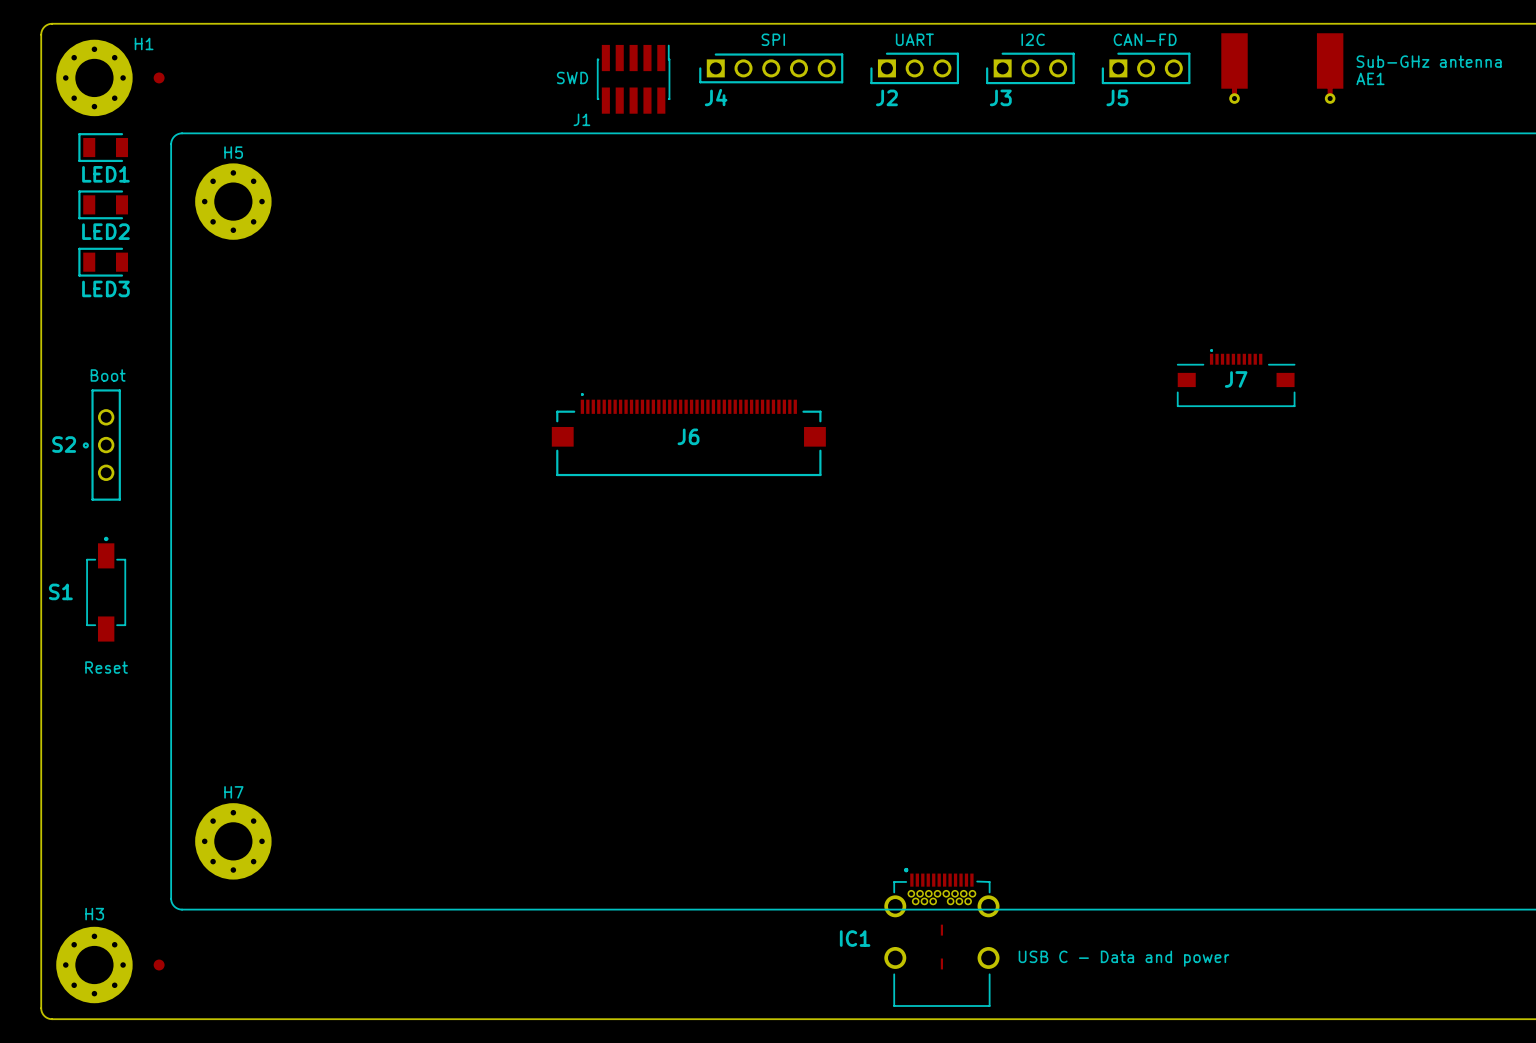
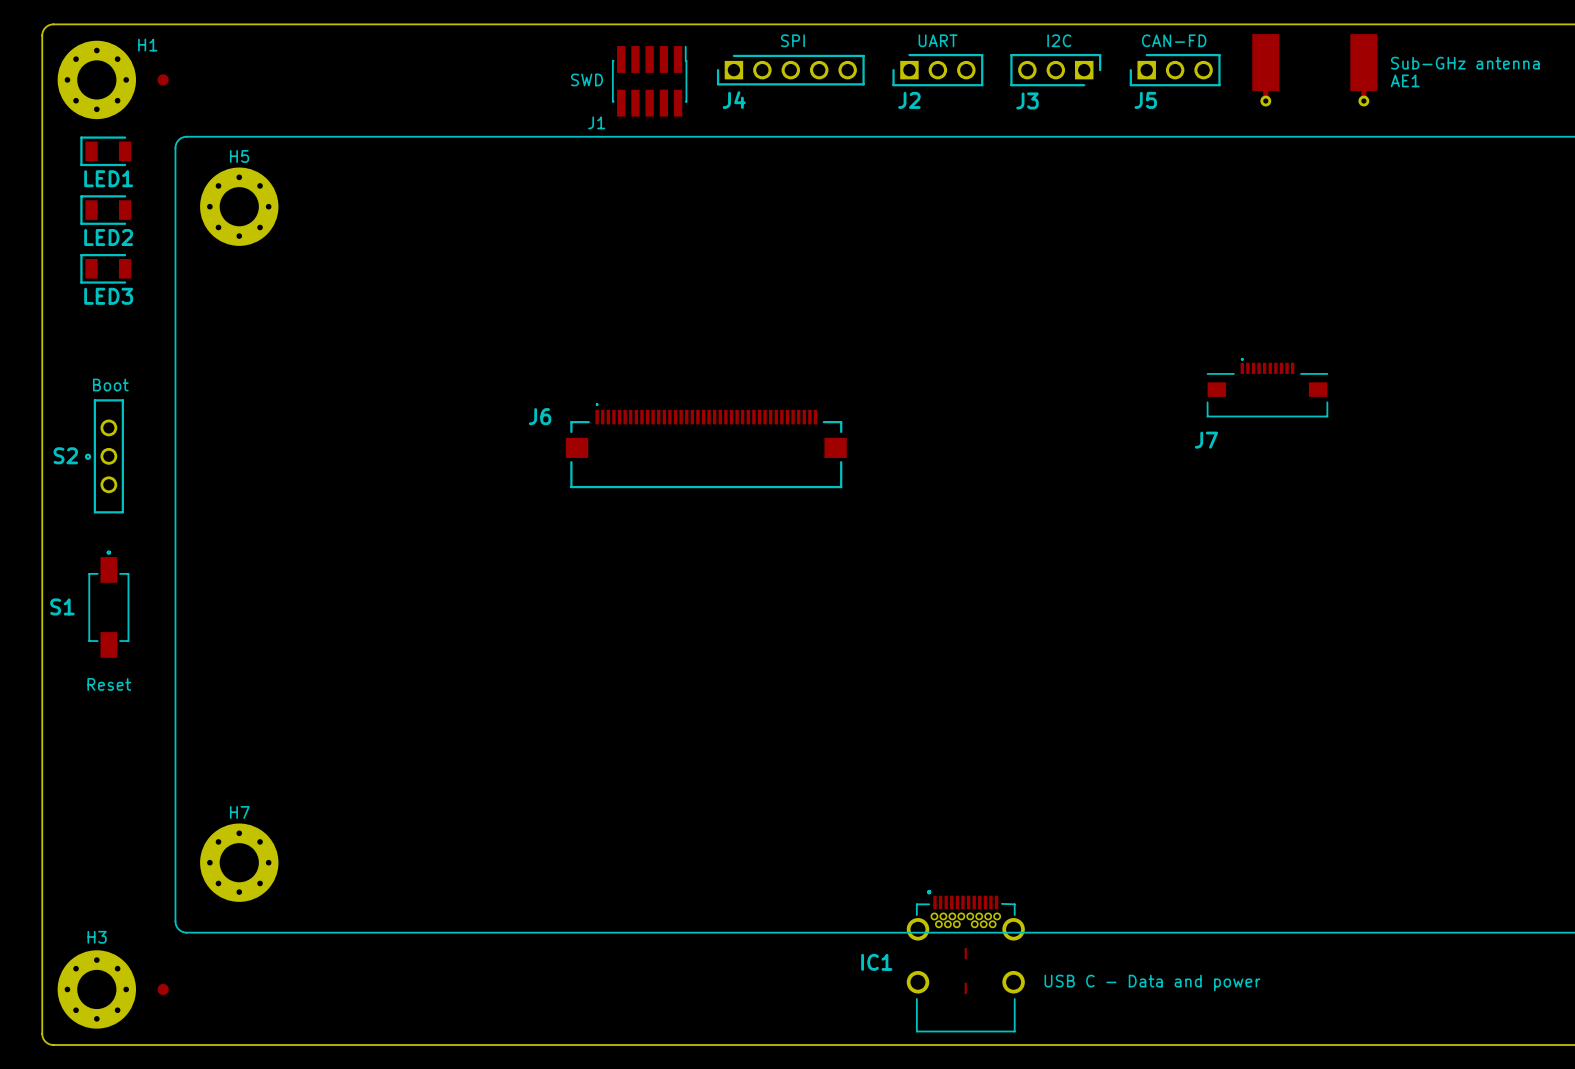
J3 rotation: 0° (1030, 68) -> 180° (1055, 70)
J7 name position: J7 (1236, 379) -> J7 (1206, 440)
J6 name position: J6 (688, 436) -> J6 (540, 416)

